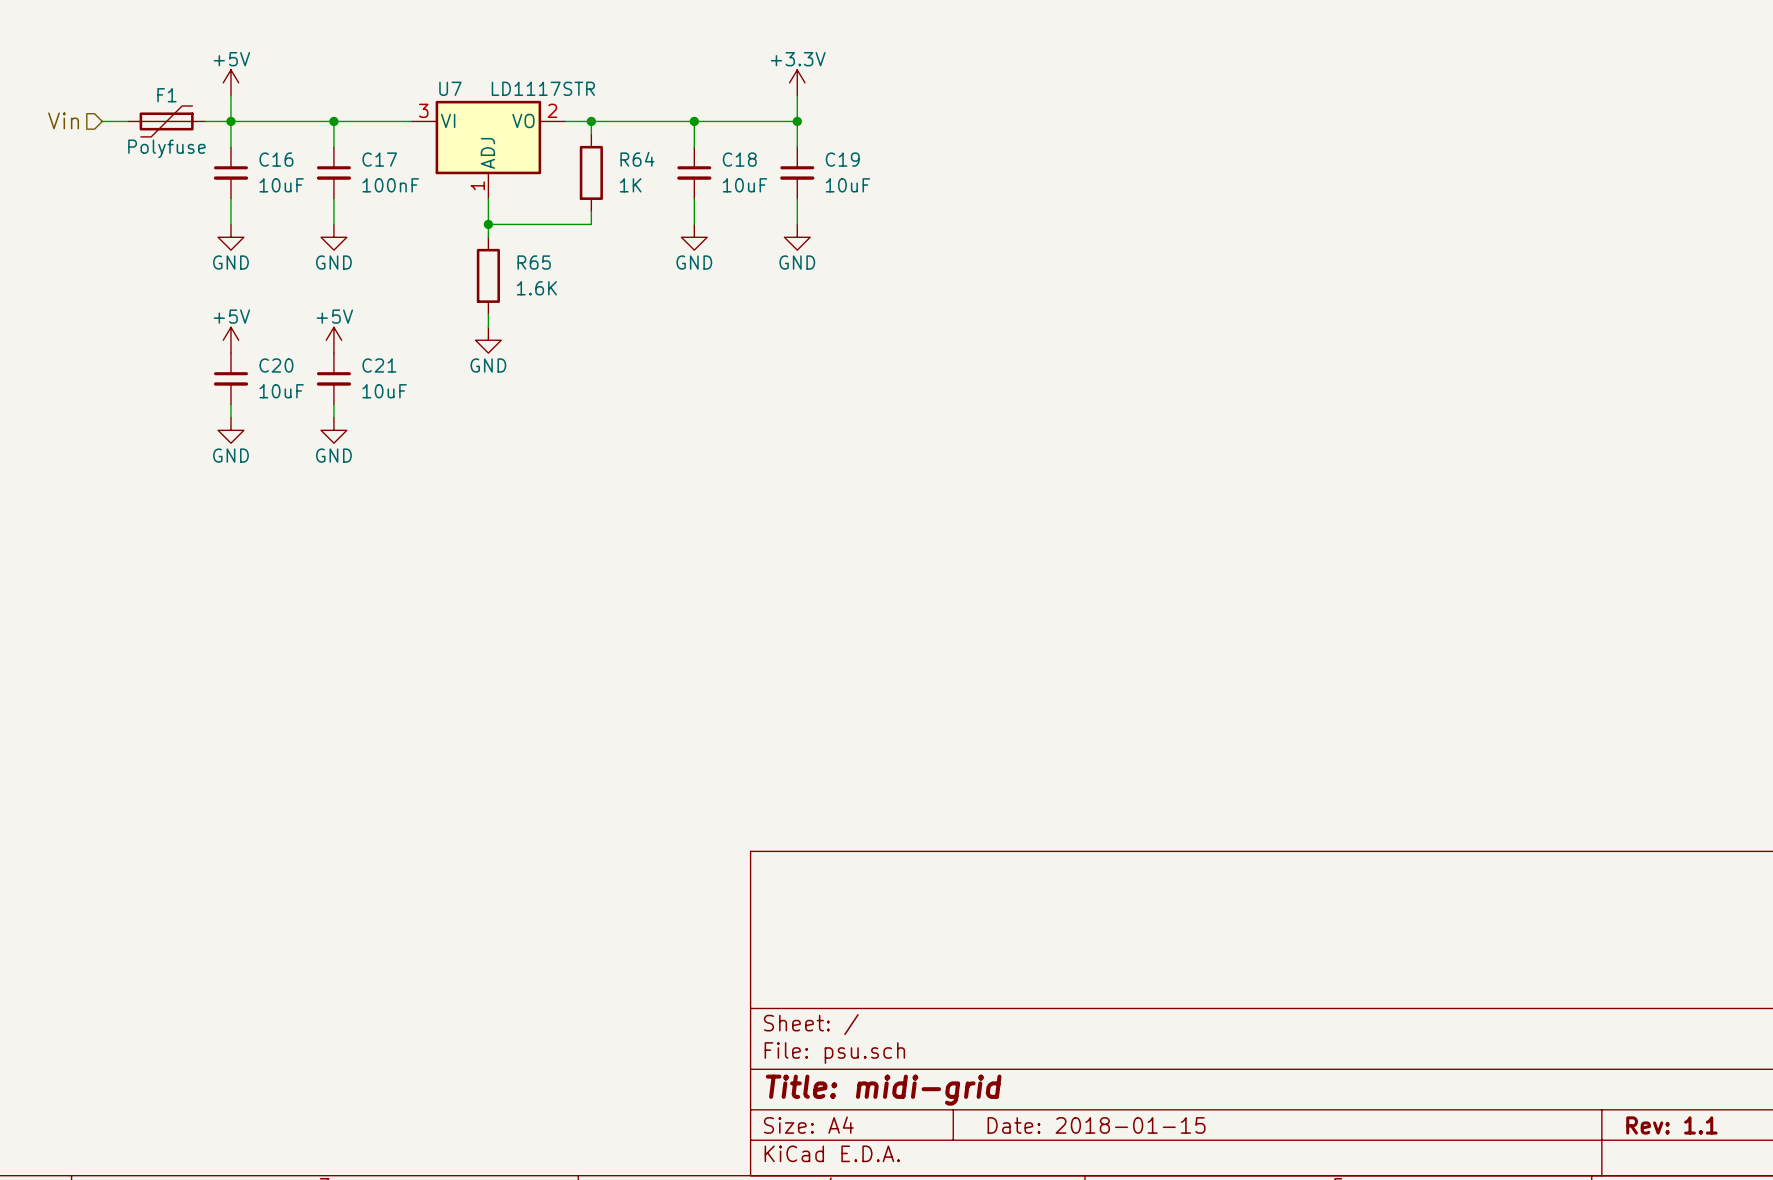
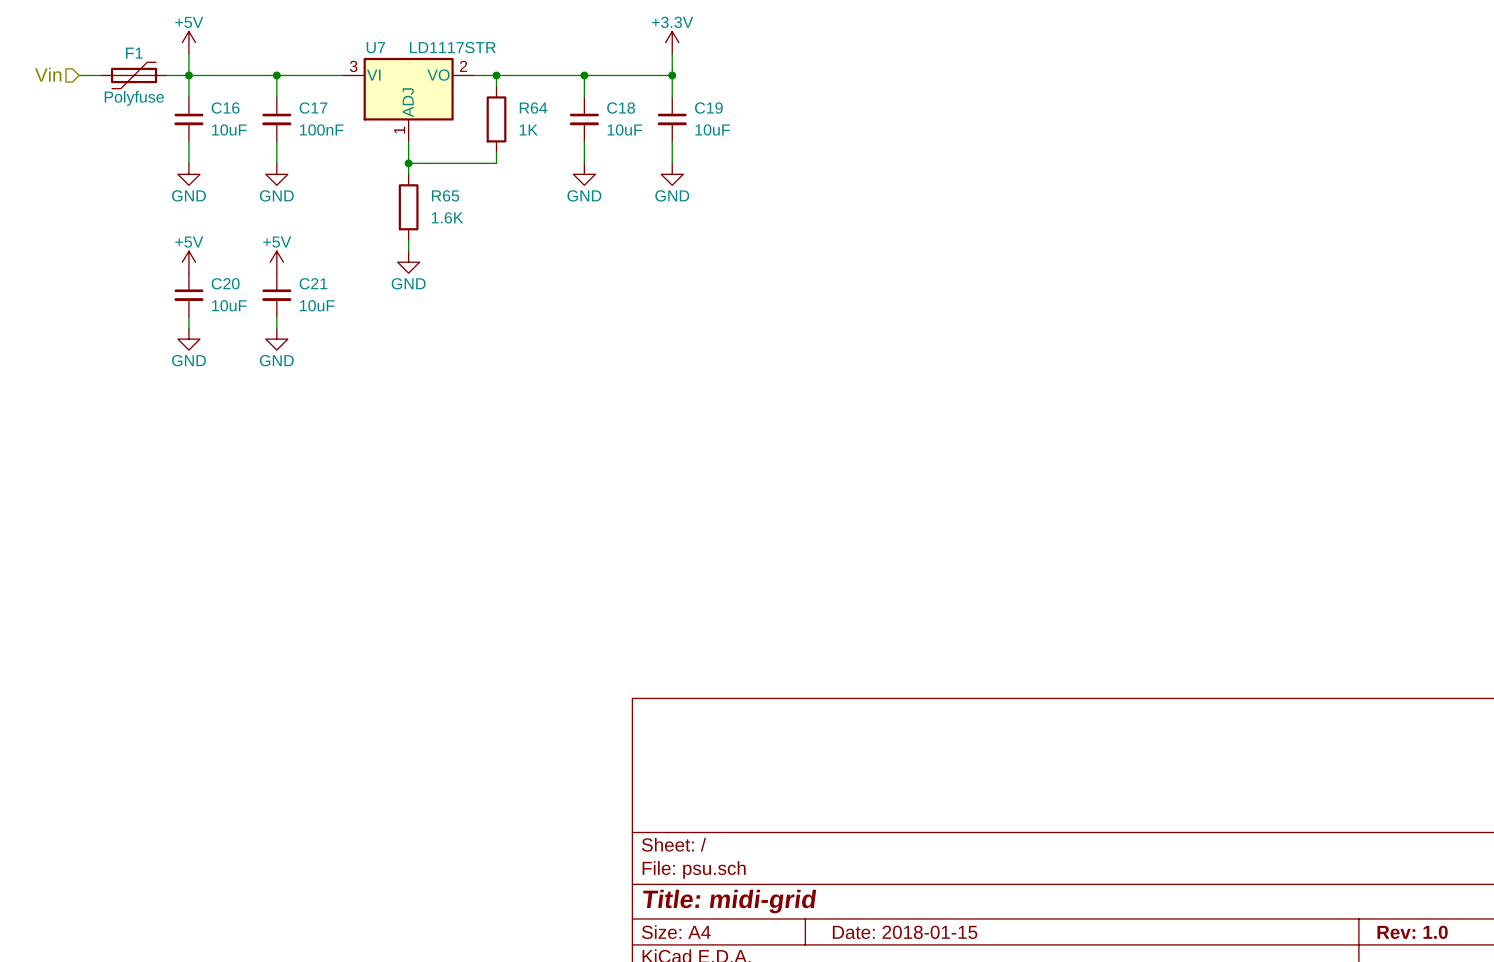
title block: Rev: 1.1 (1671, 1125) -> Rev: 1.0 (1412, 932)

